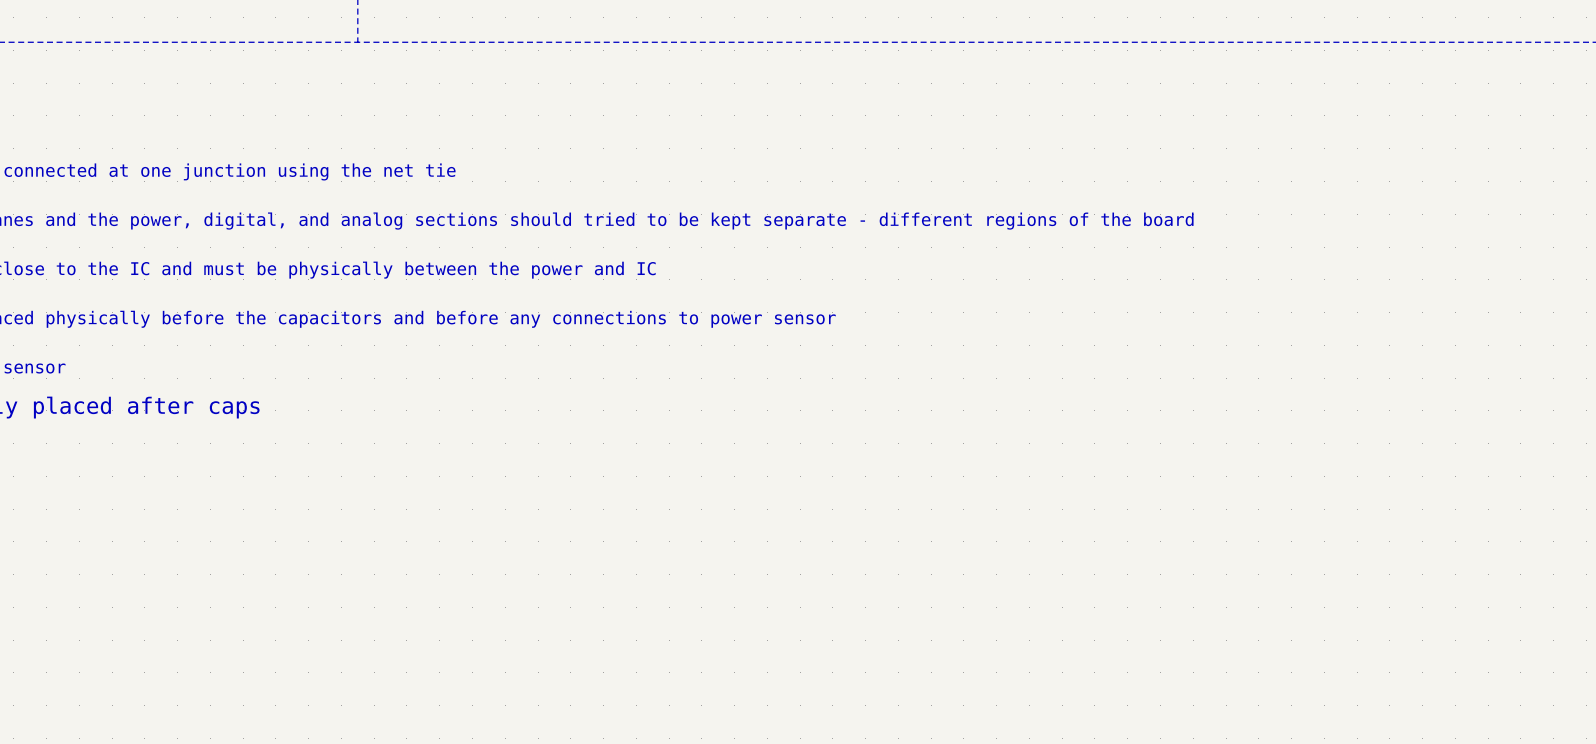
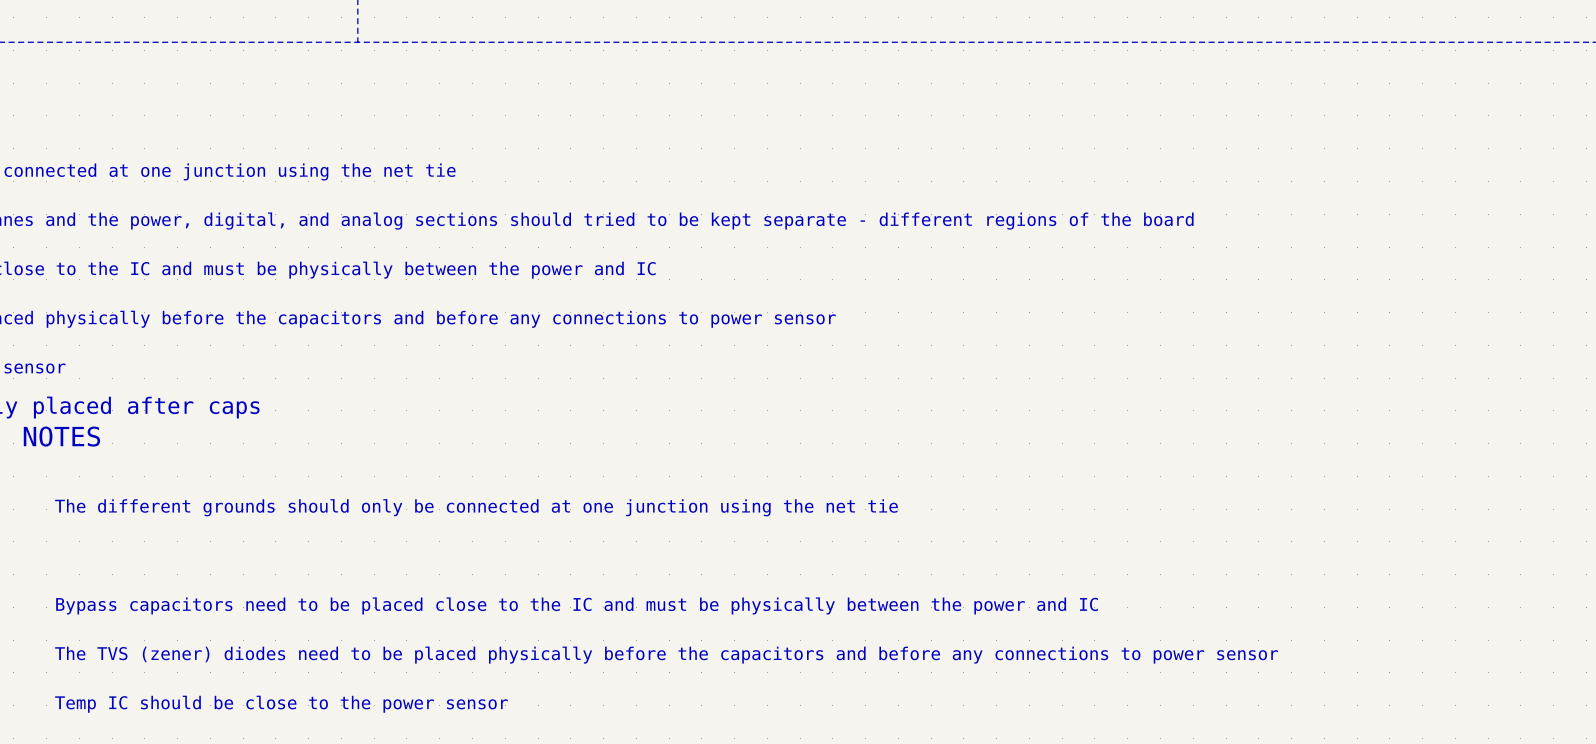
text: none -> NOTES (61, 436)
text: none -> The different grounds should only be connected at one junction using the net tie (476, 507)
text: none -> Bypass capacitors need to be placed close to the IC and must be physically between the power and IC (577, 605)
text: none -> The TVS (zener) diodes need to be placed physically before the capacitors and before any connections to power sensor (666, 655)
text: none -> Temp IC should be close to the power sensor (281, 704)

